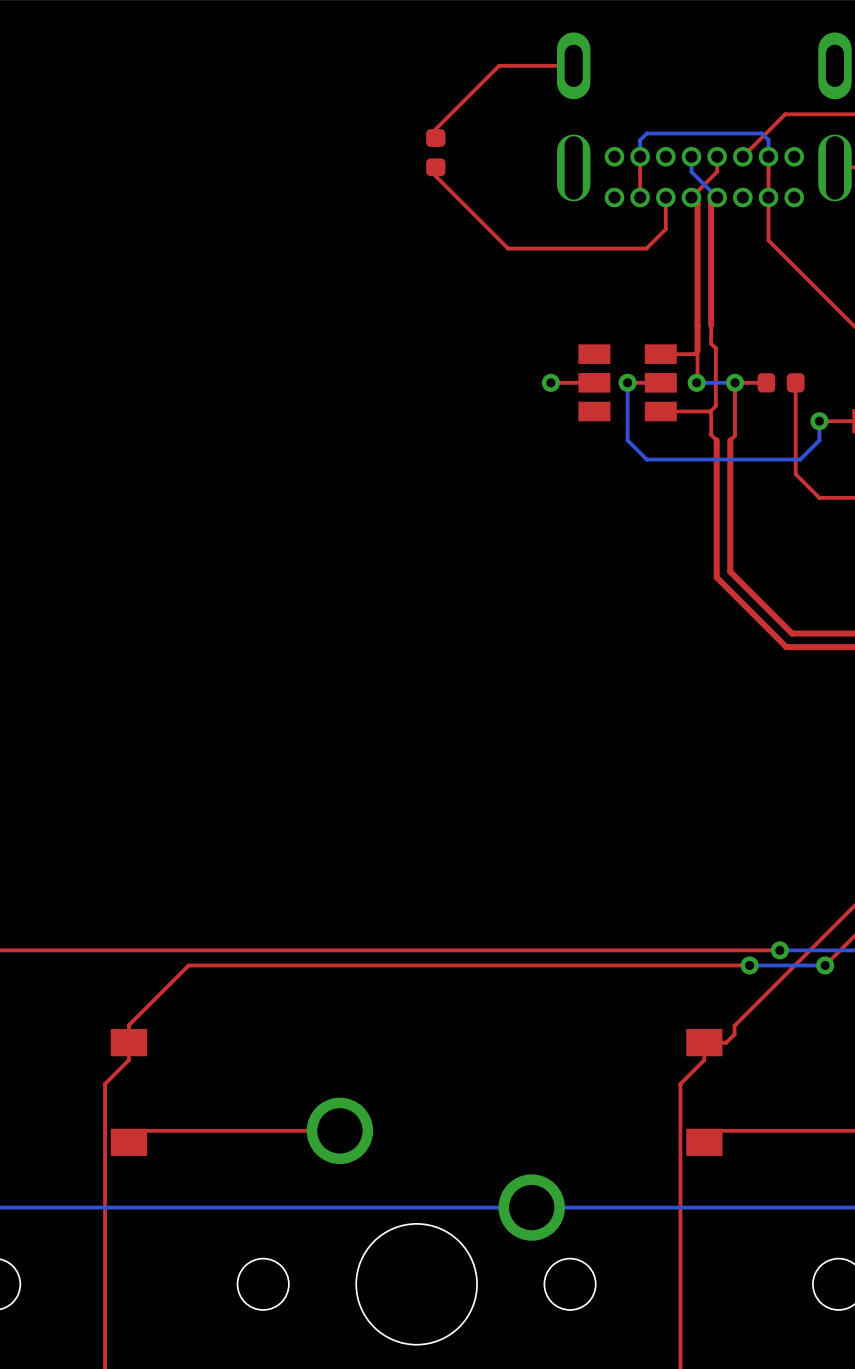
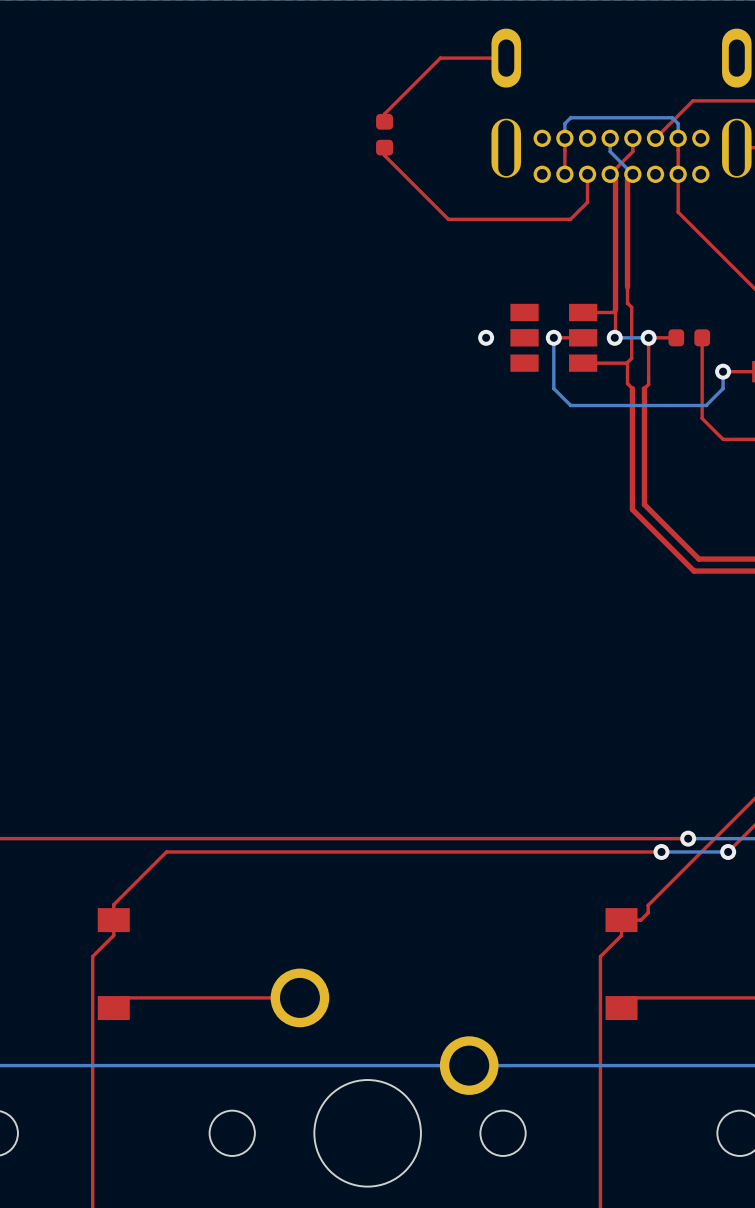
top track: (594, 382) (550, 382) -> none

